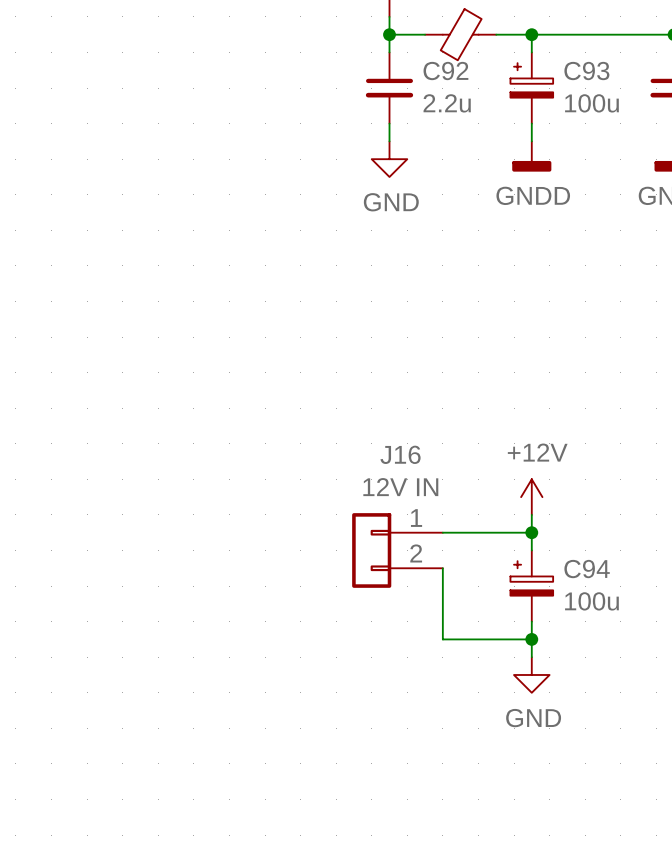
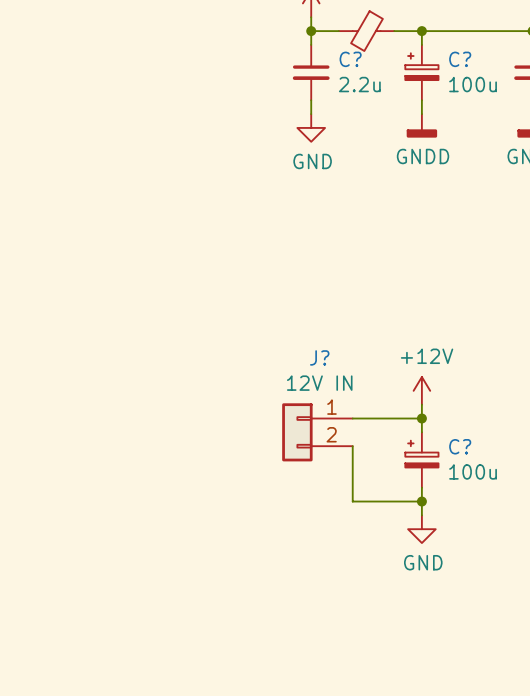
C92 name: C92 (445, 71) -> C? (350, 59)
C93 name: C93 (586, 71) -> C? (460, 59)
J16 name: J16 (400, 454) -> J? (319, 357)
C94 name: C94 (587, 569) -> C? (460, 446)

